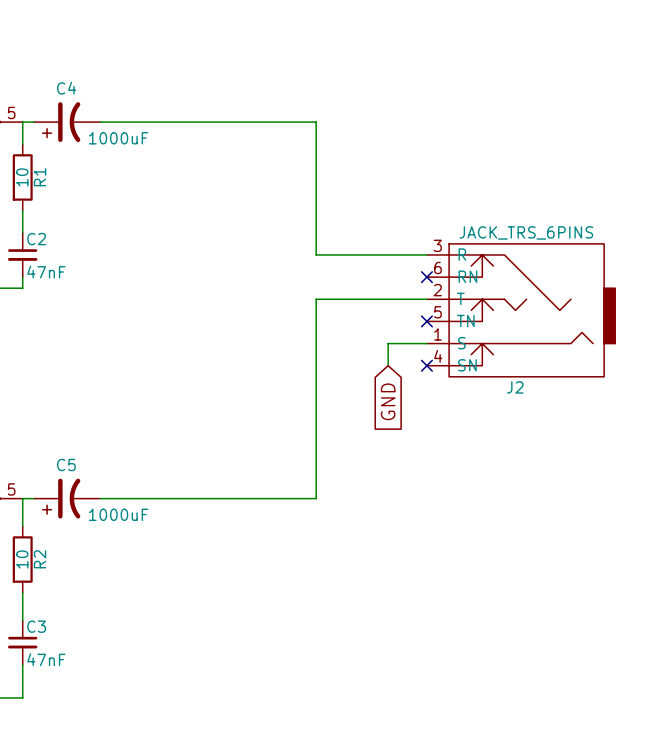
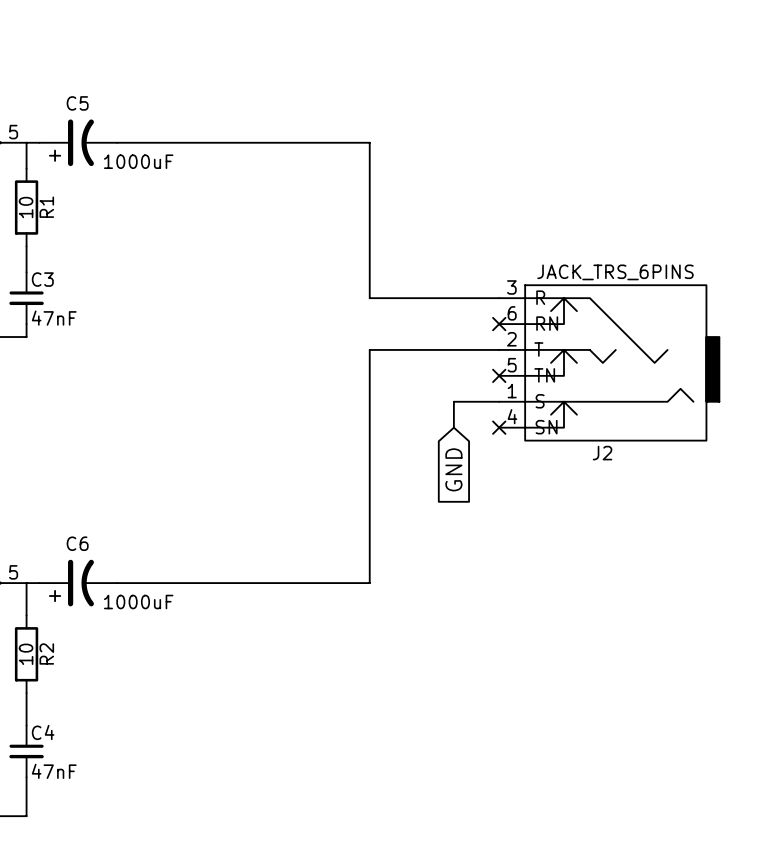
C4 name: C4 (66, 88) -> C5 (77, 103)
C2 name: C2 (36, 239) -> C3 (42, 279)
C5 name: C5 (66, 464) -> C6 (77, 543)
C3 name: C3 (36, 626) -> C4 (43, 732)

